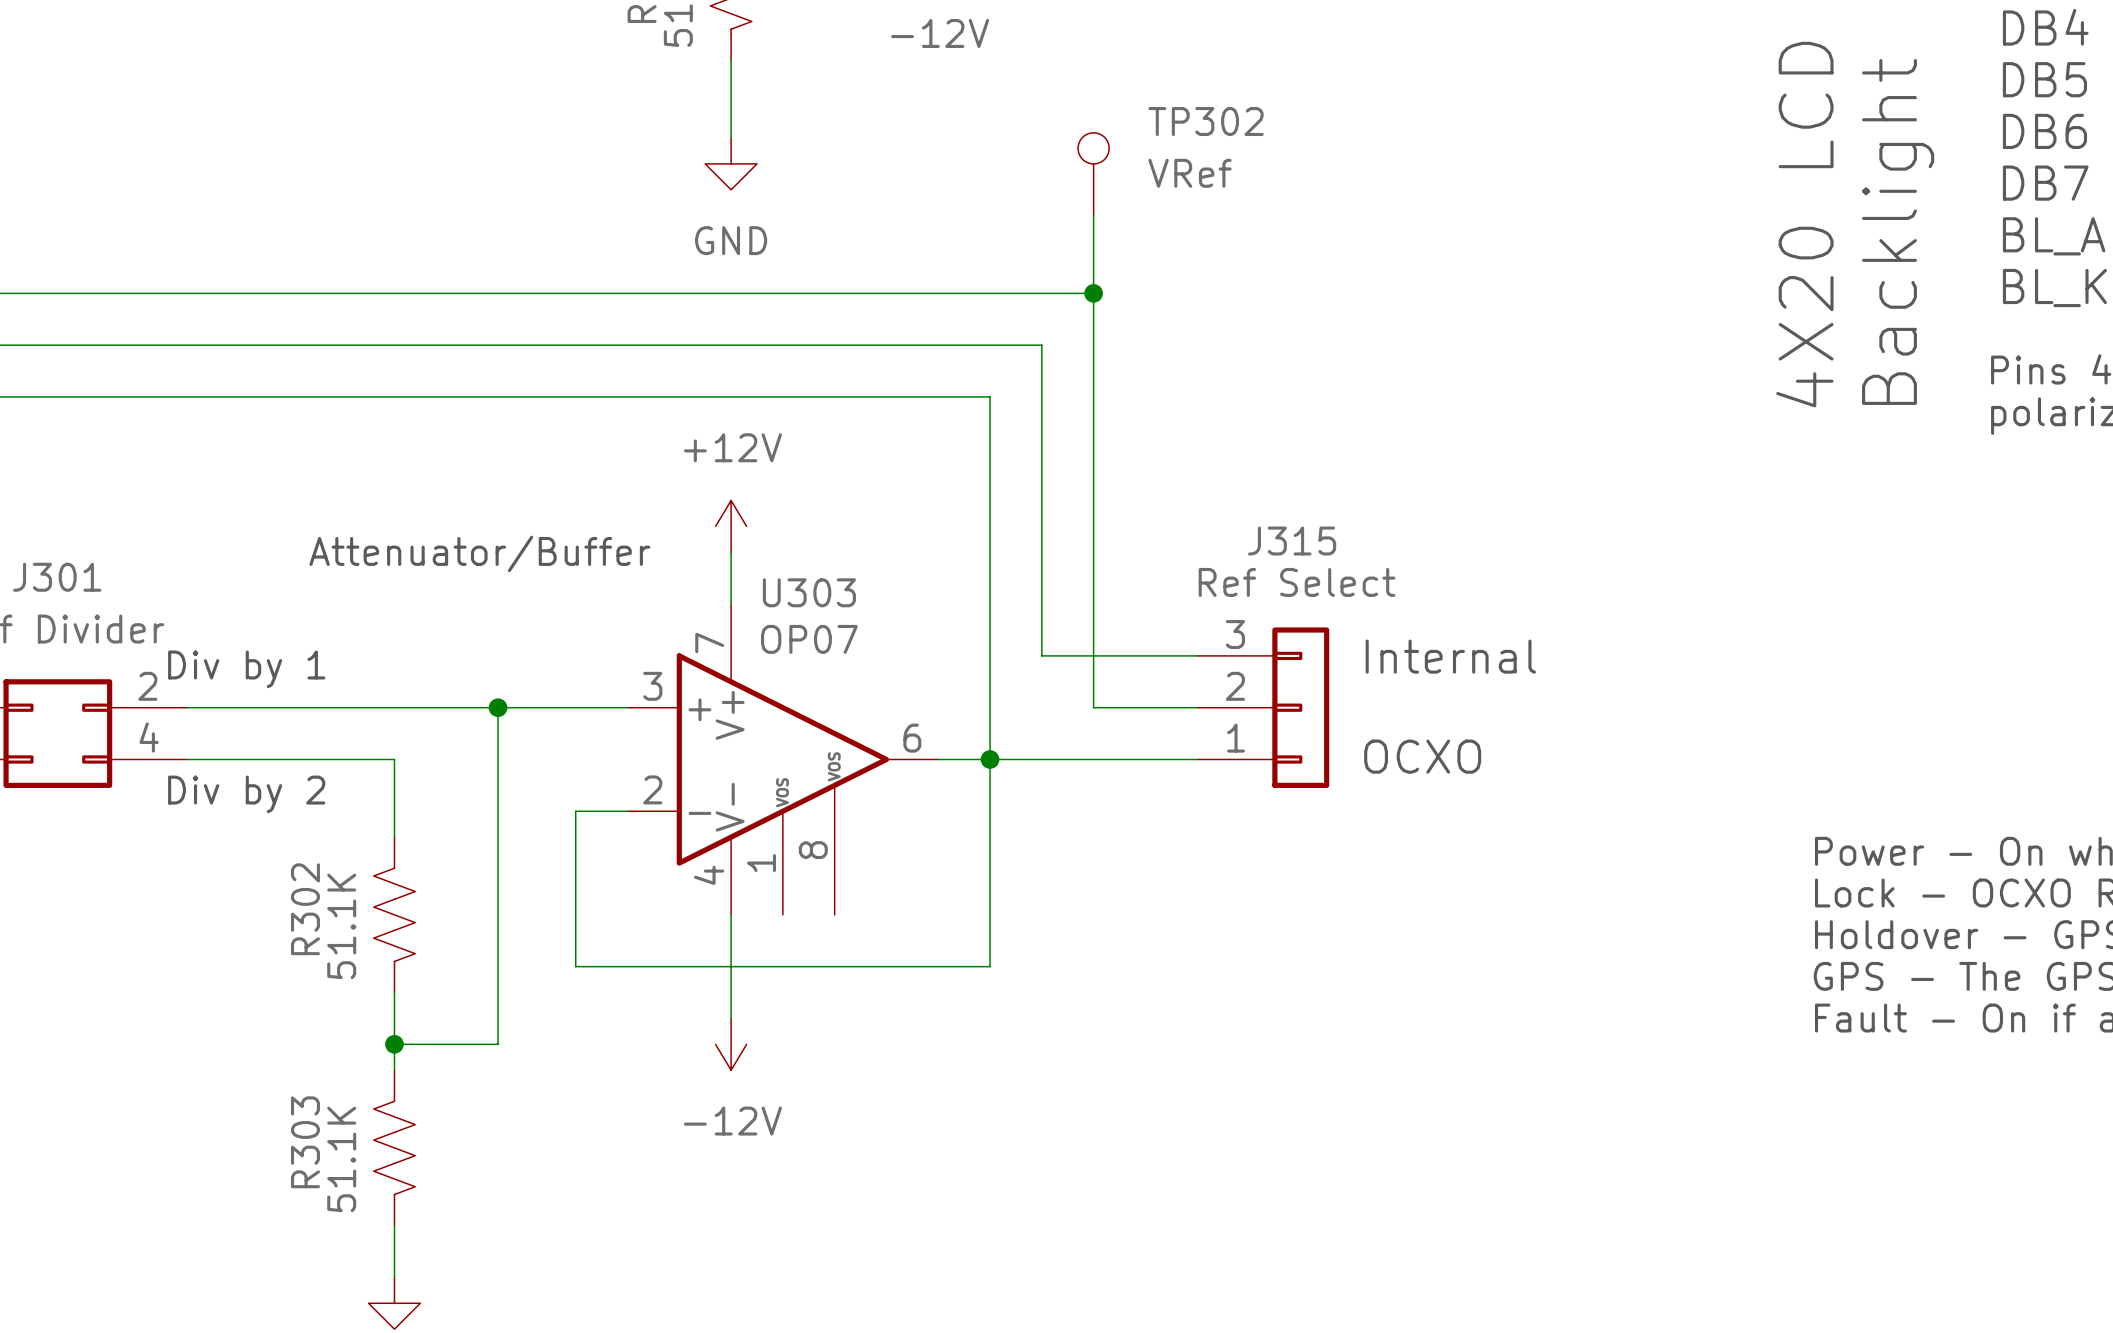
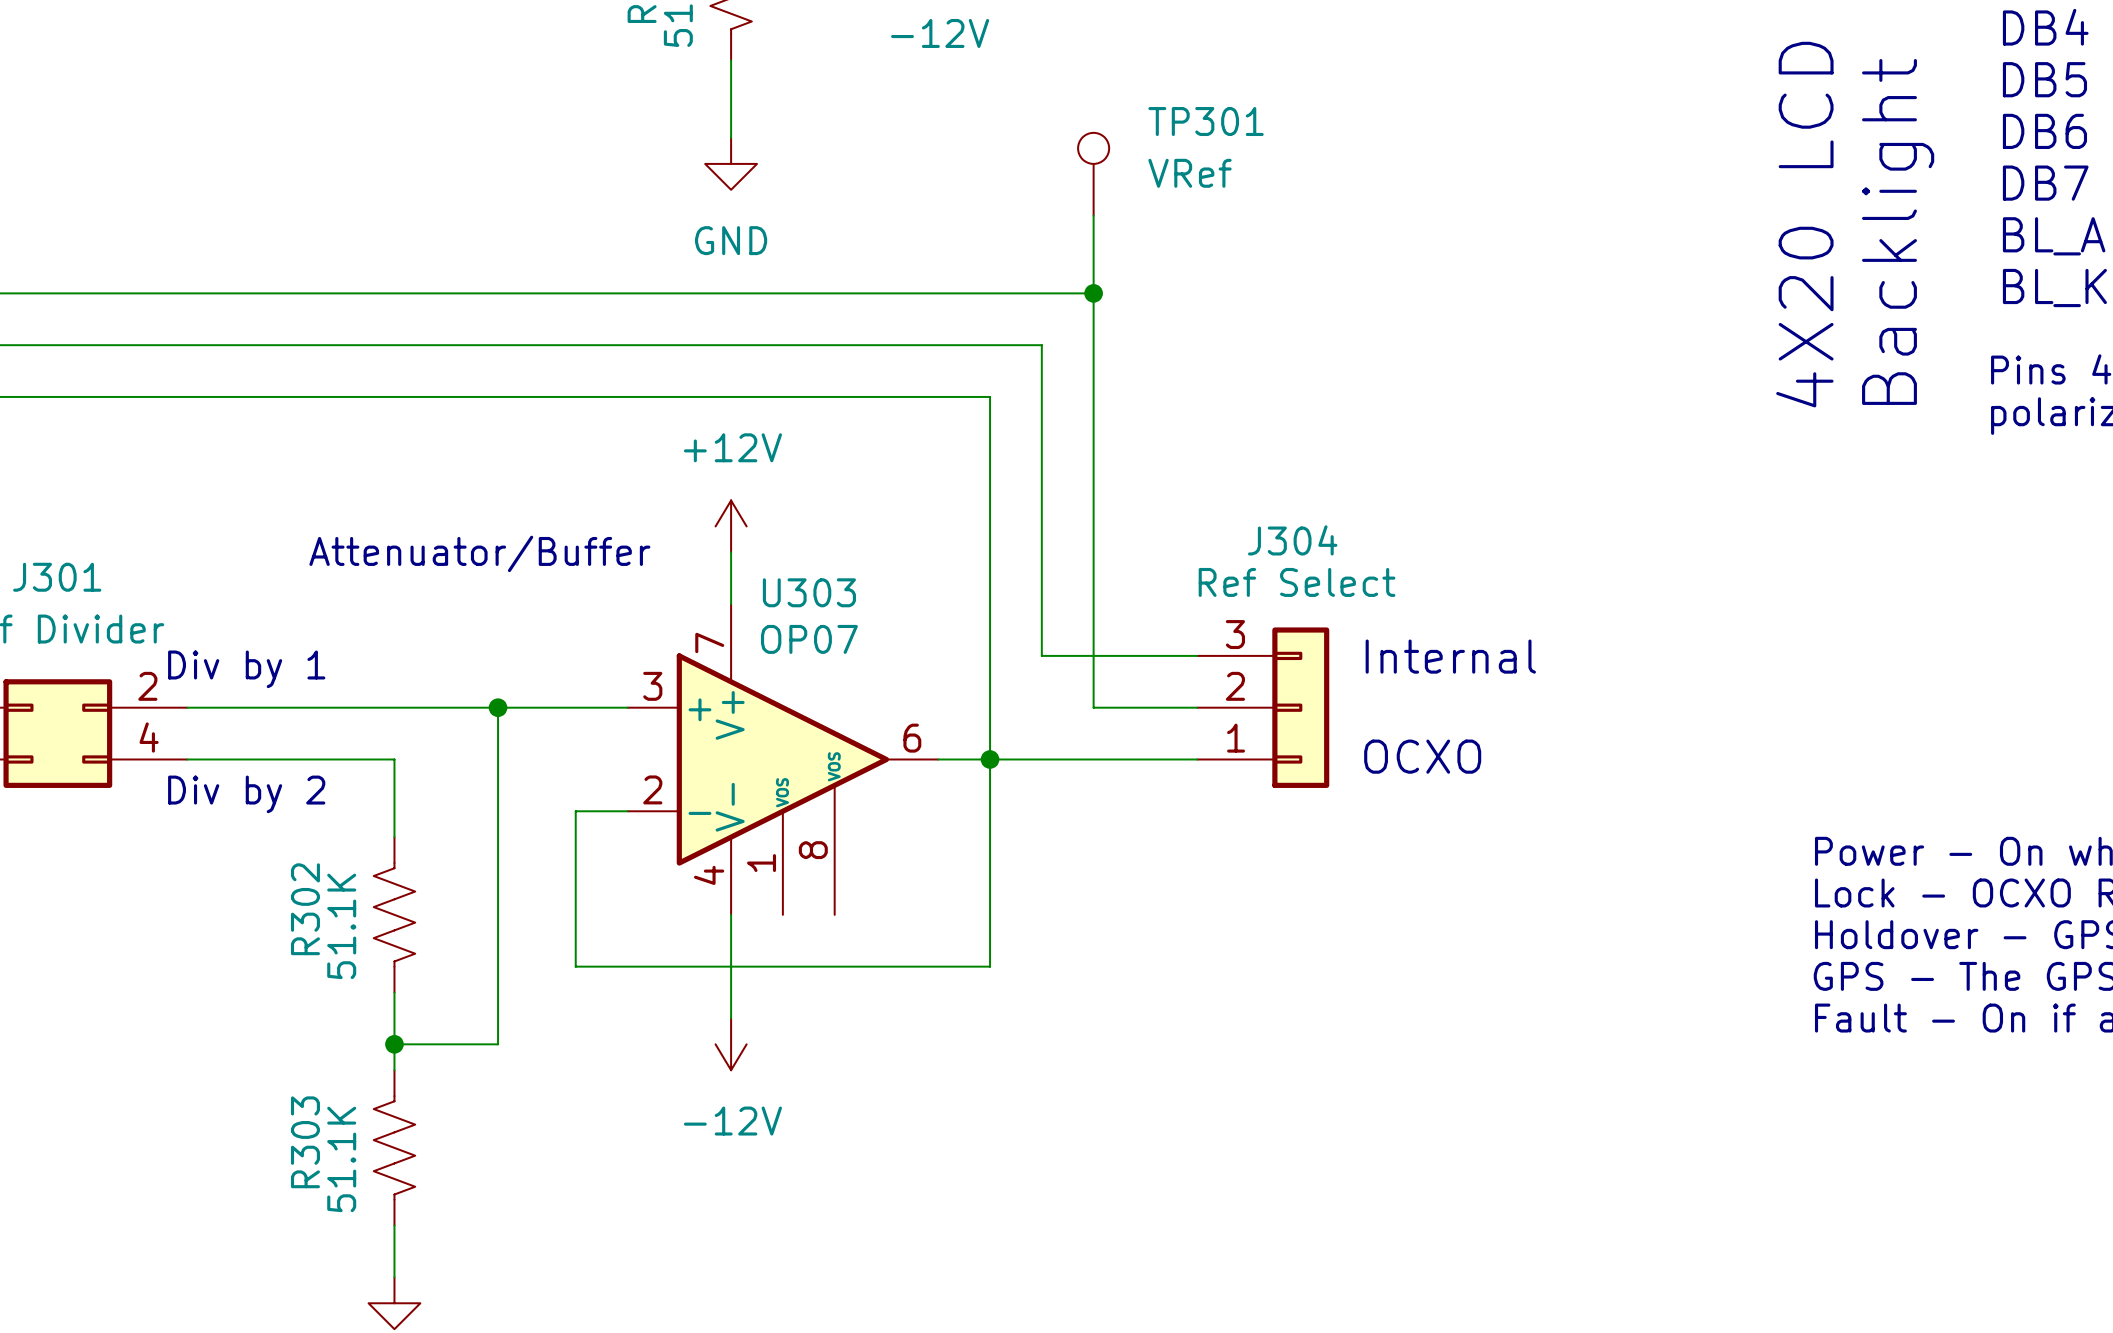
TP302 name: TP302 (1206, 121) -> TP301 (1206, 121)
J315 name: J315 (1292, 541) -> J304 (1292, 540)

